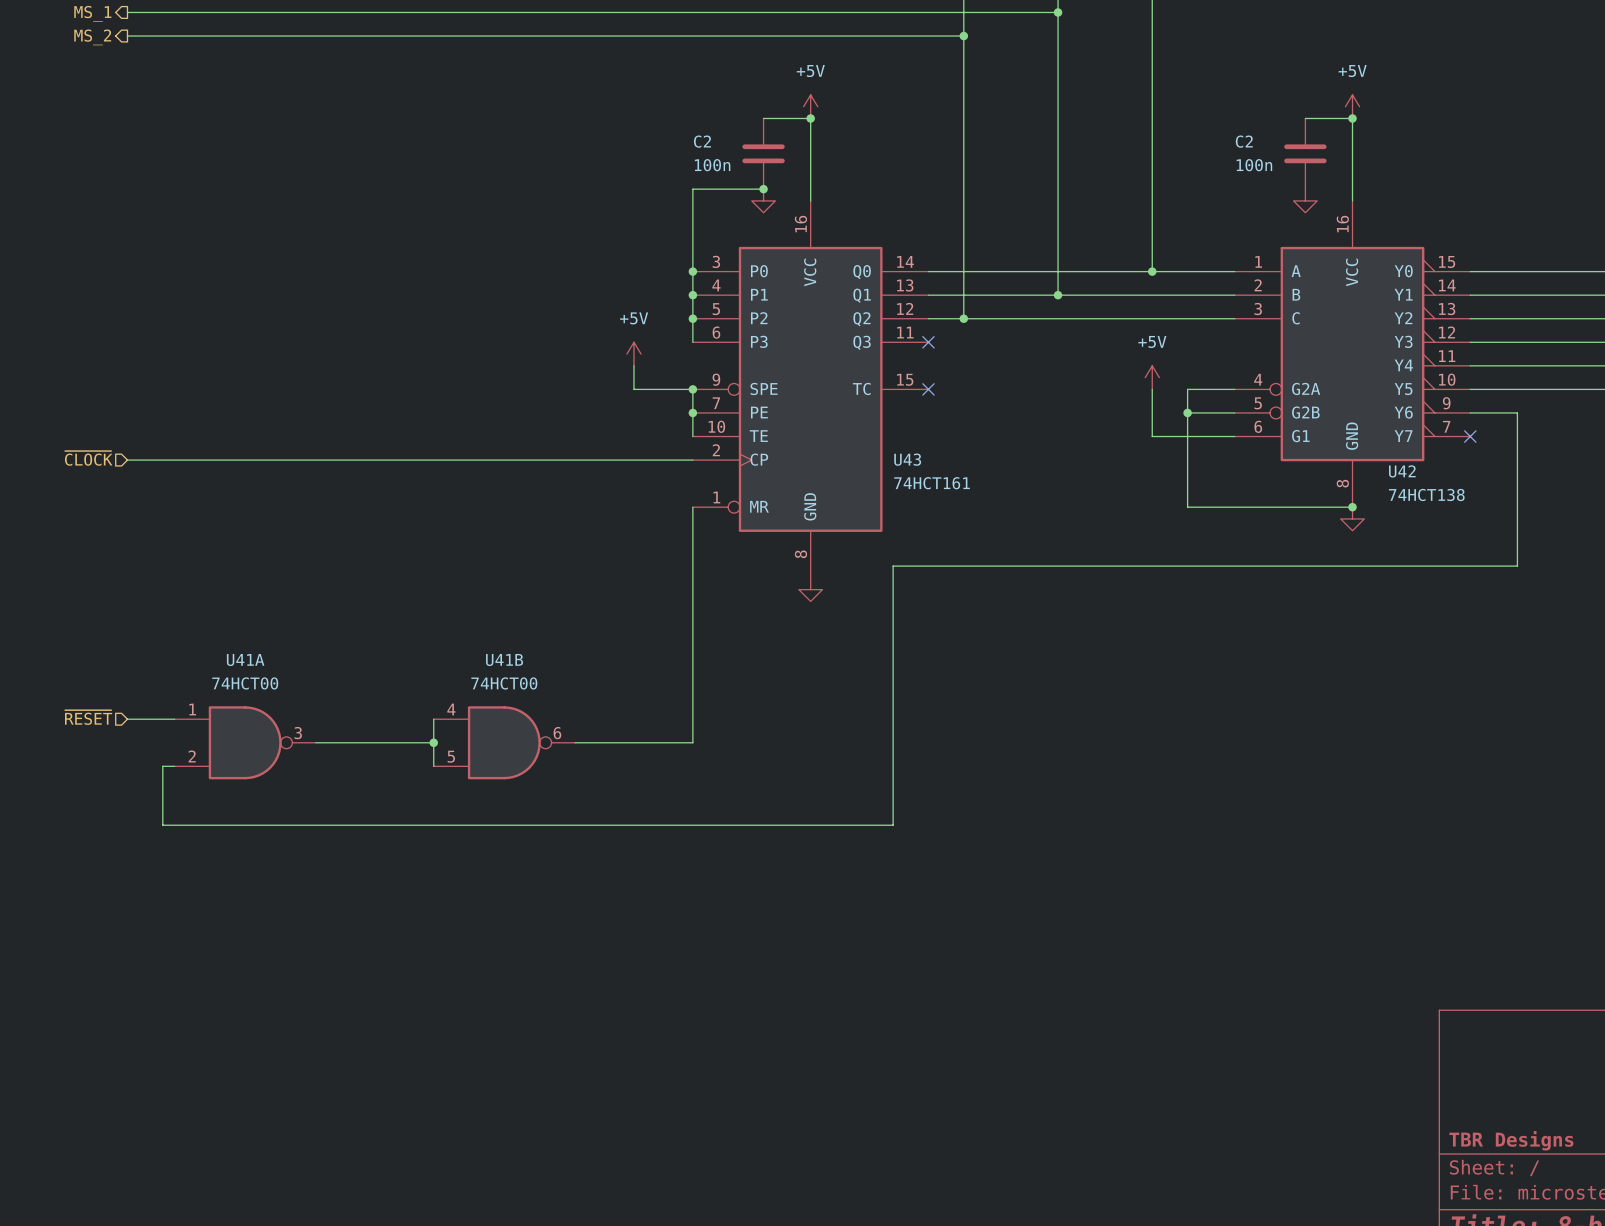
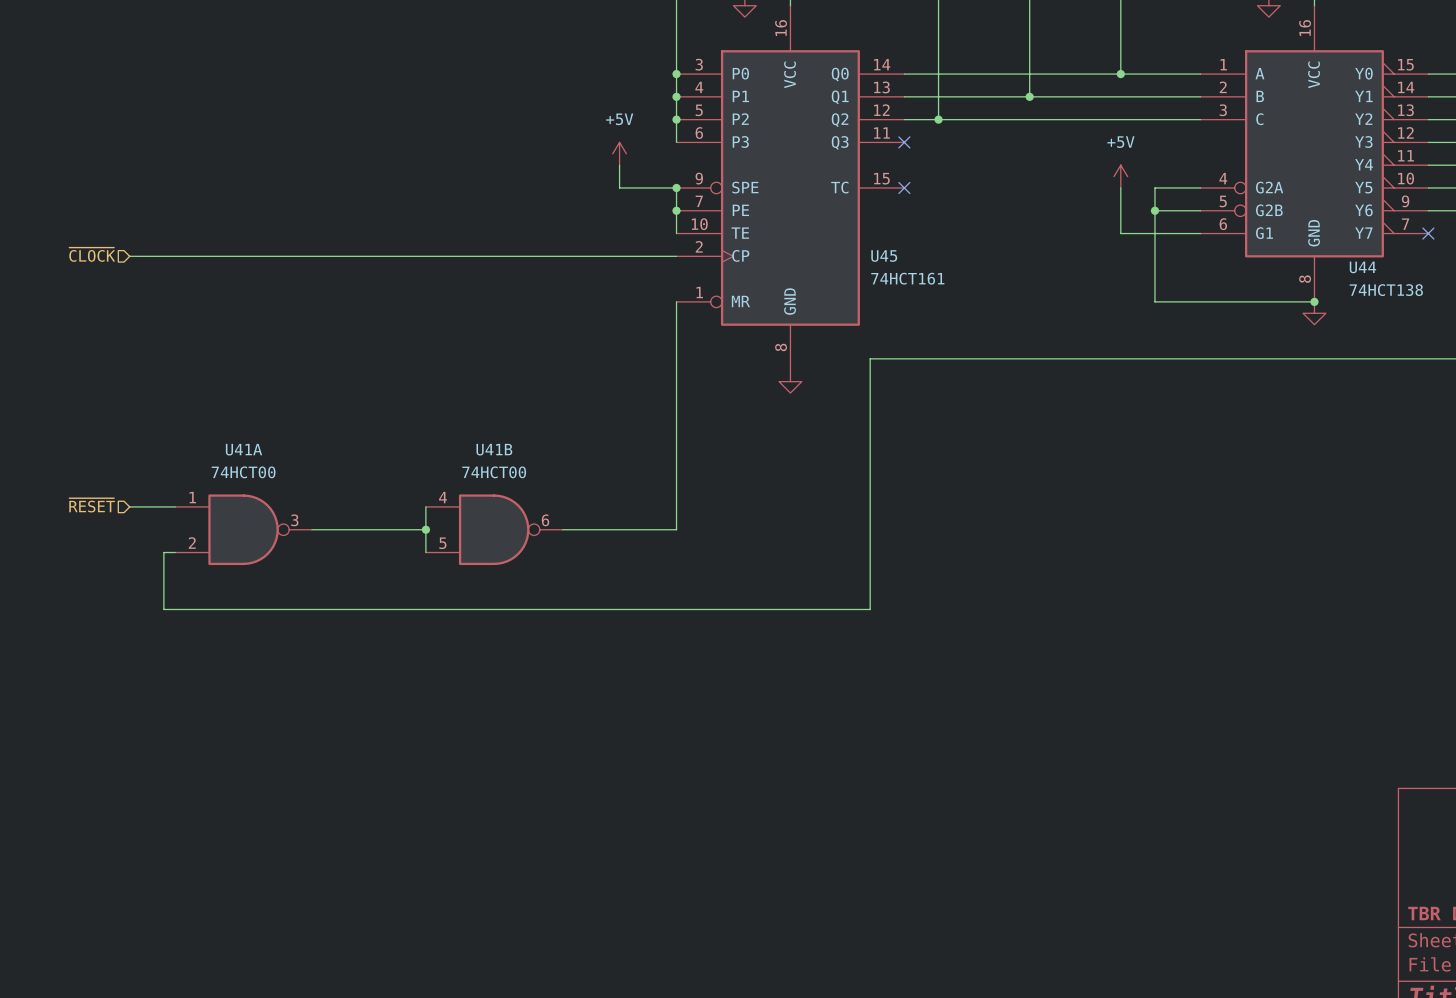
U43 name: U43 (907, 459) -> U45 (884, 256)
U42 name: U42 (1402, 471) -> U44 (1362, 267)

